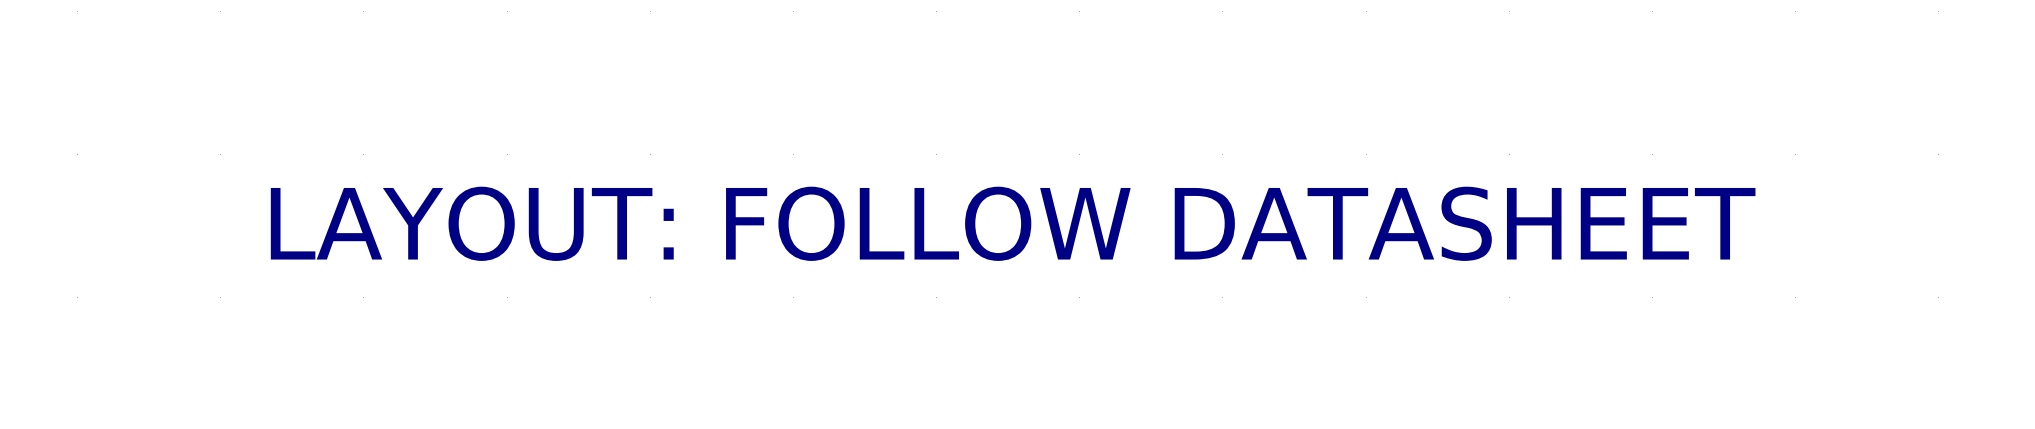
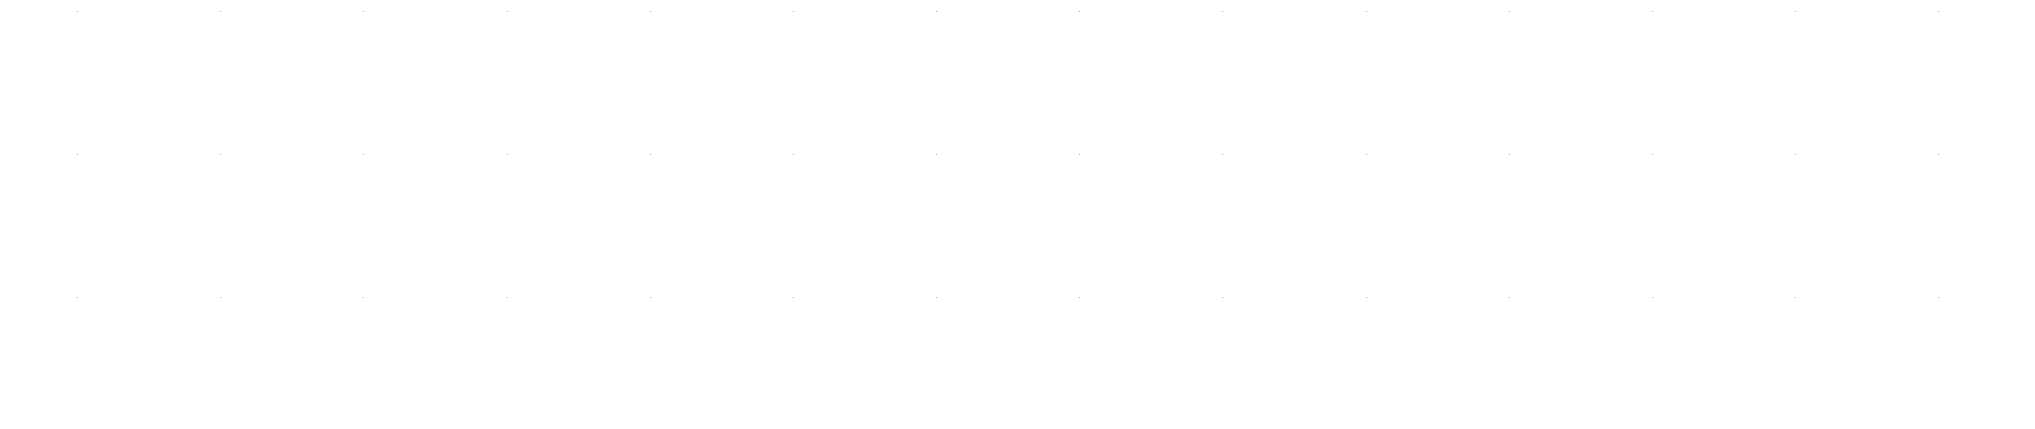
text: LAYOUT: FOLLOW DATASHEET (1013, 223) -> none

